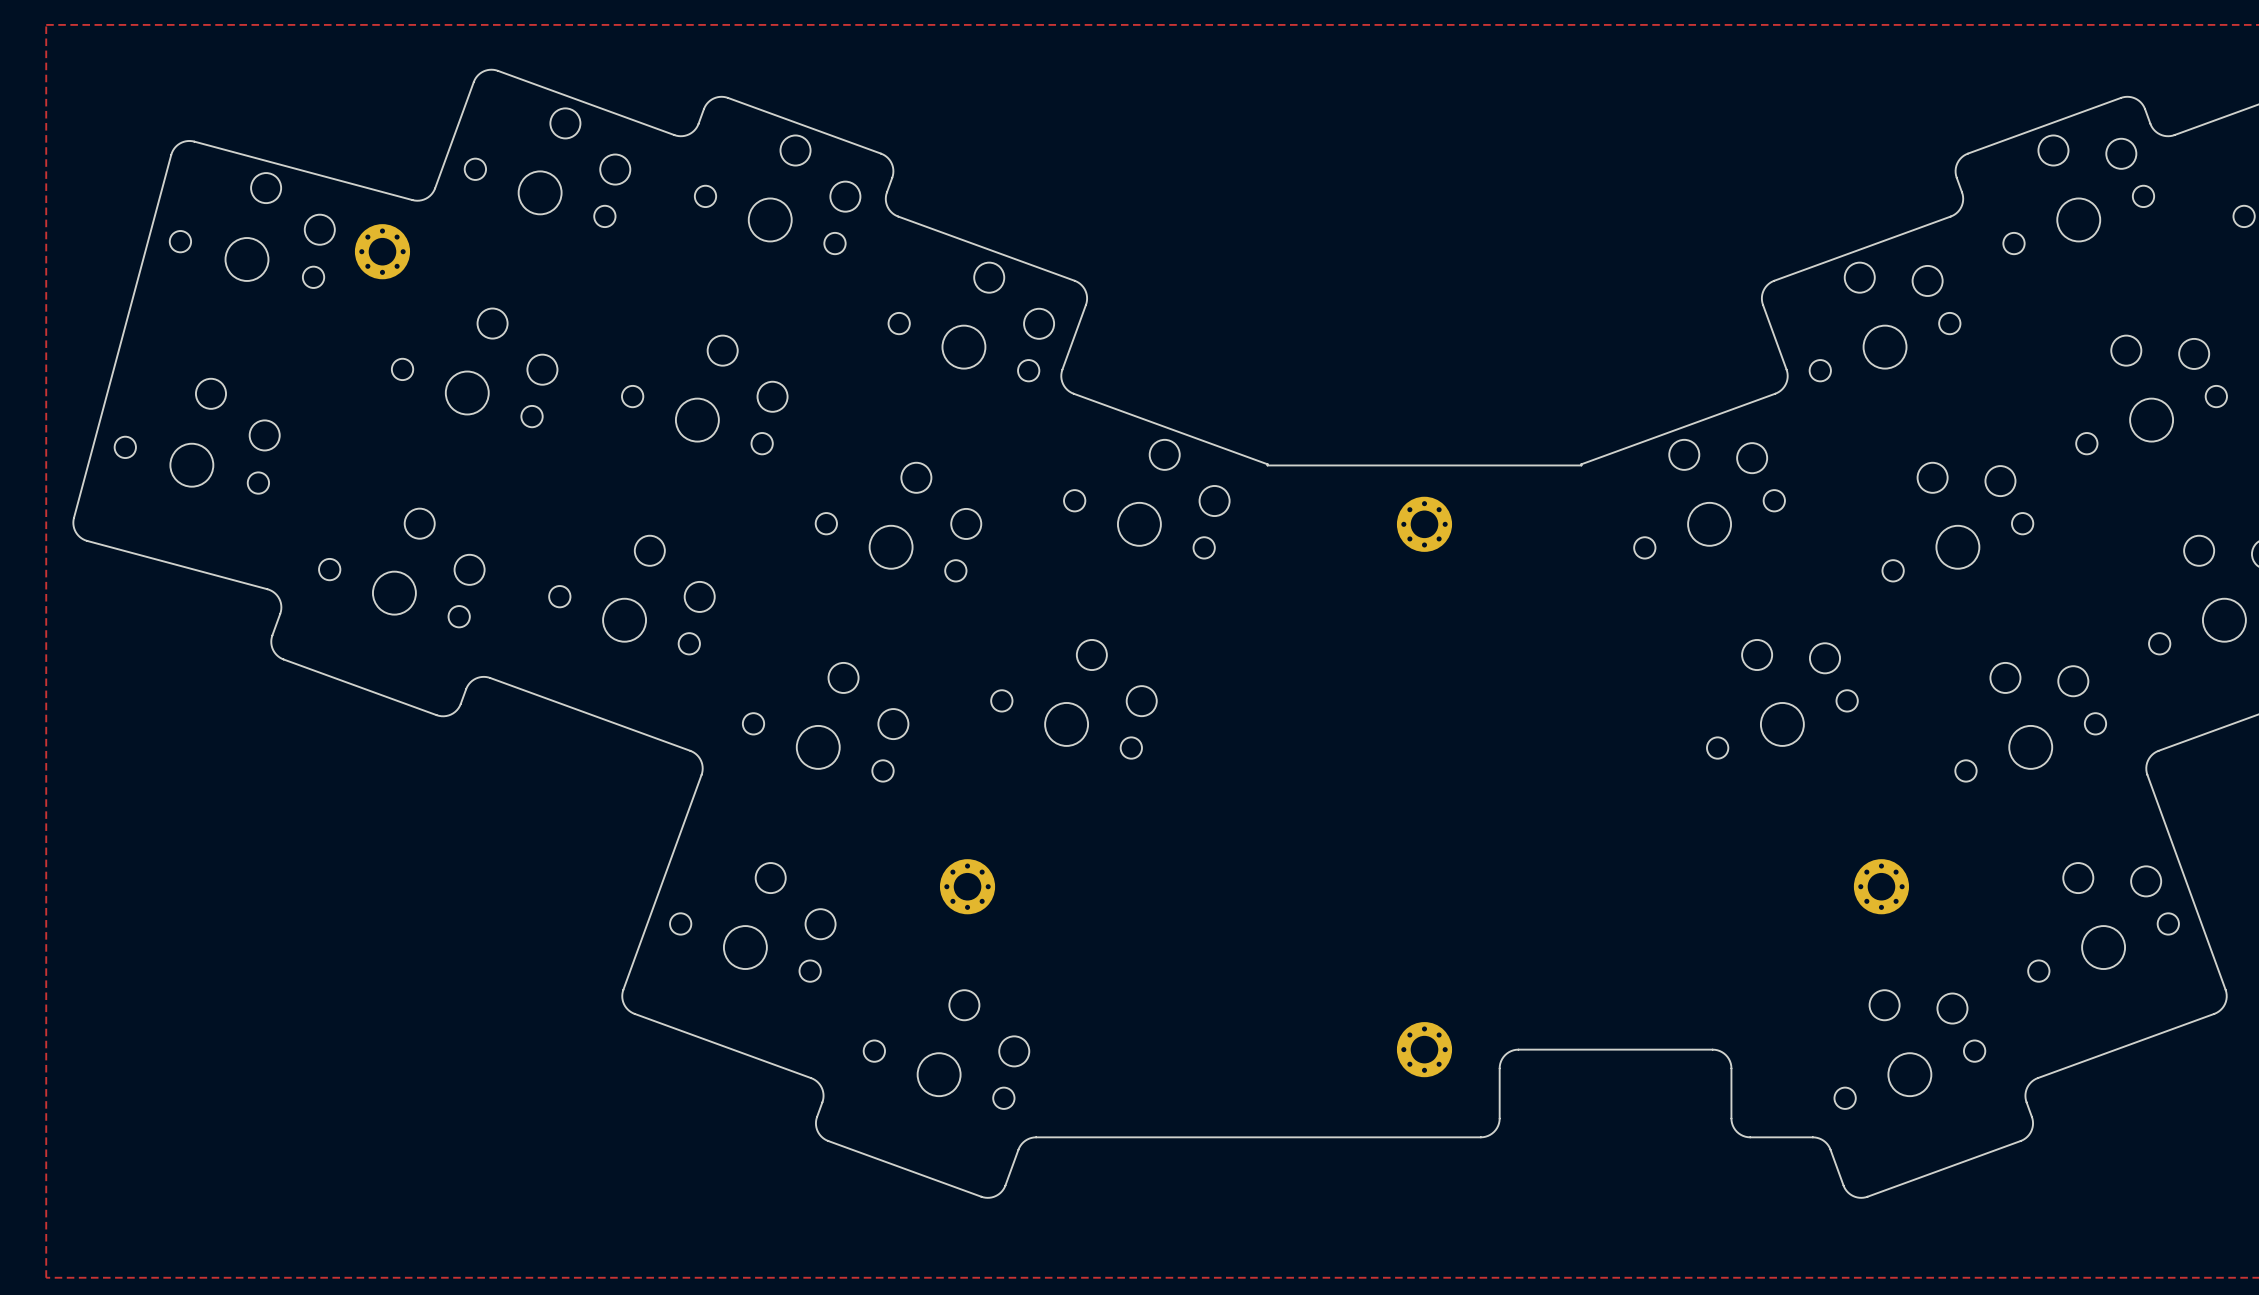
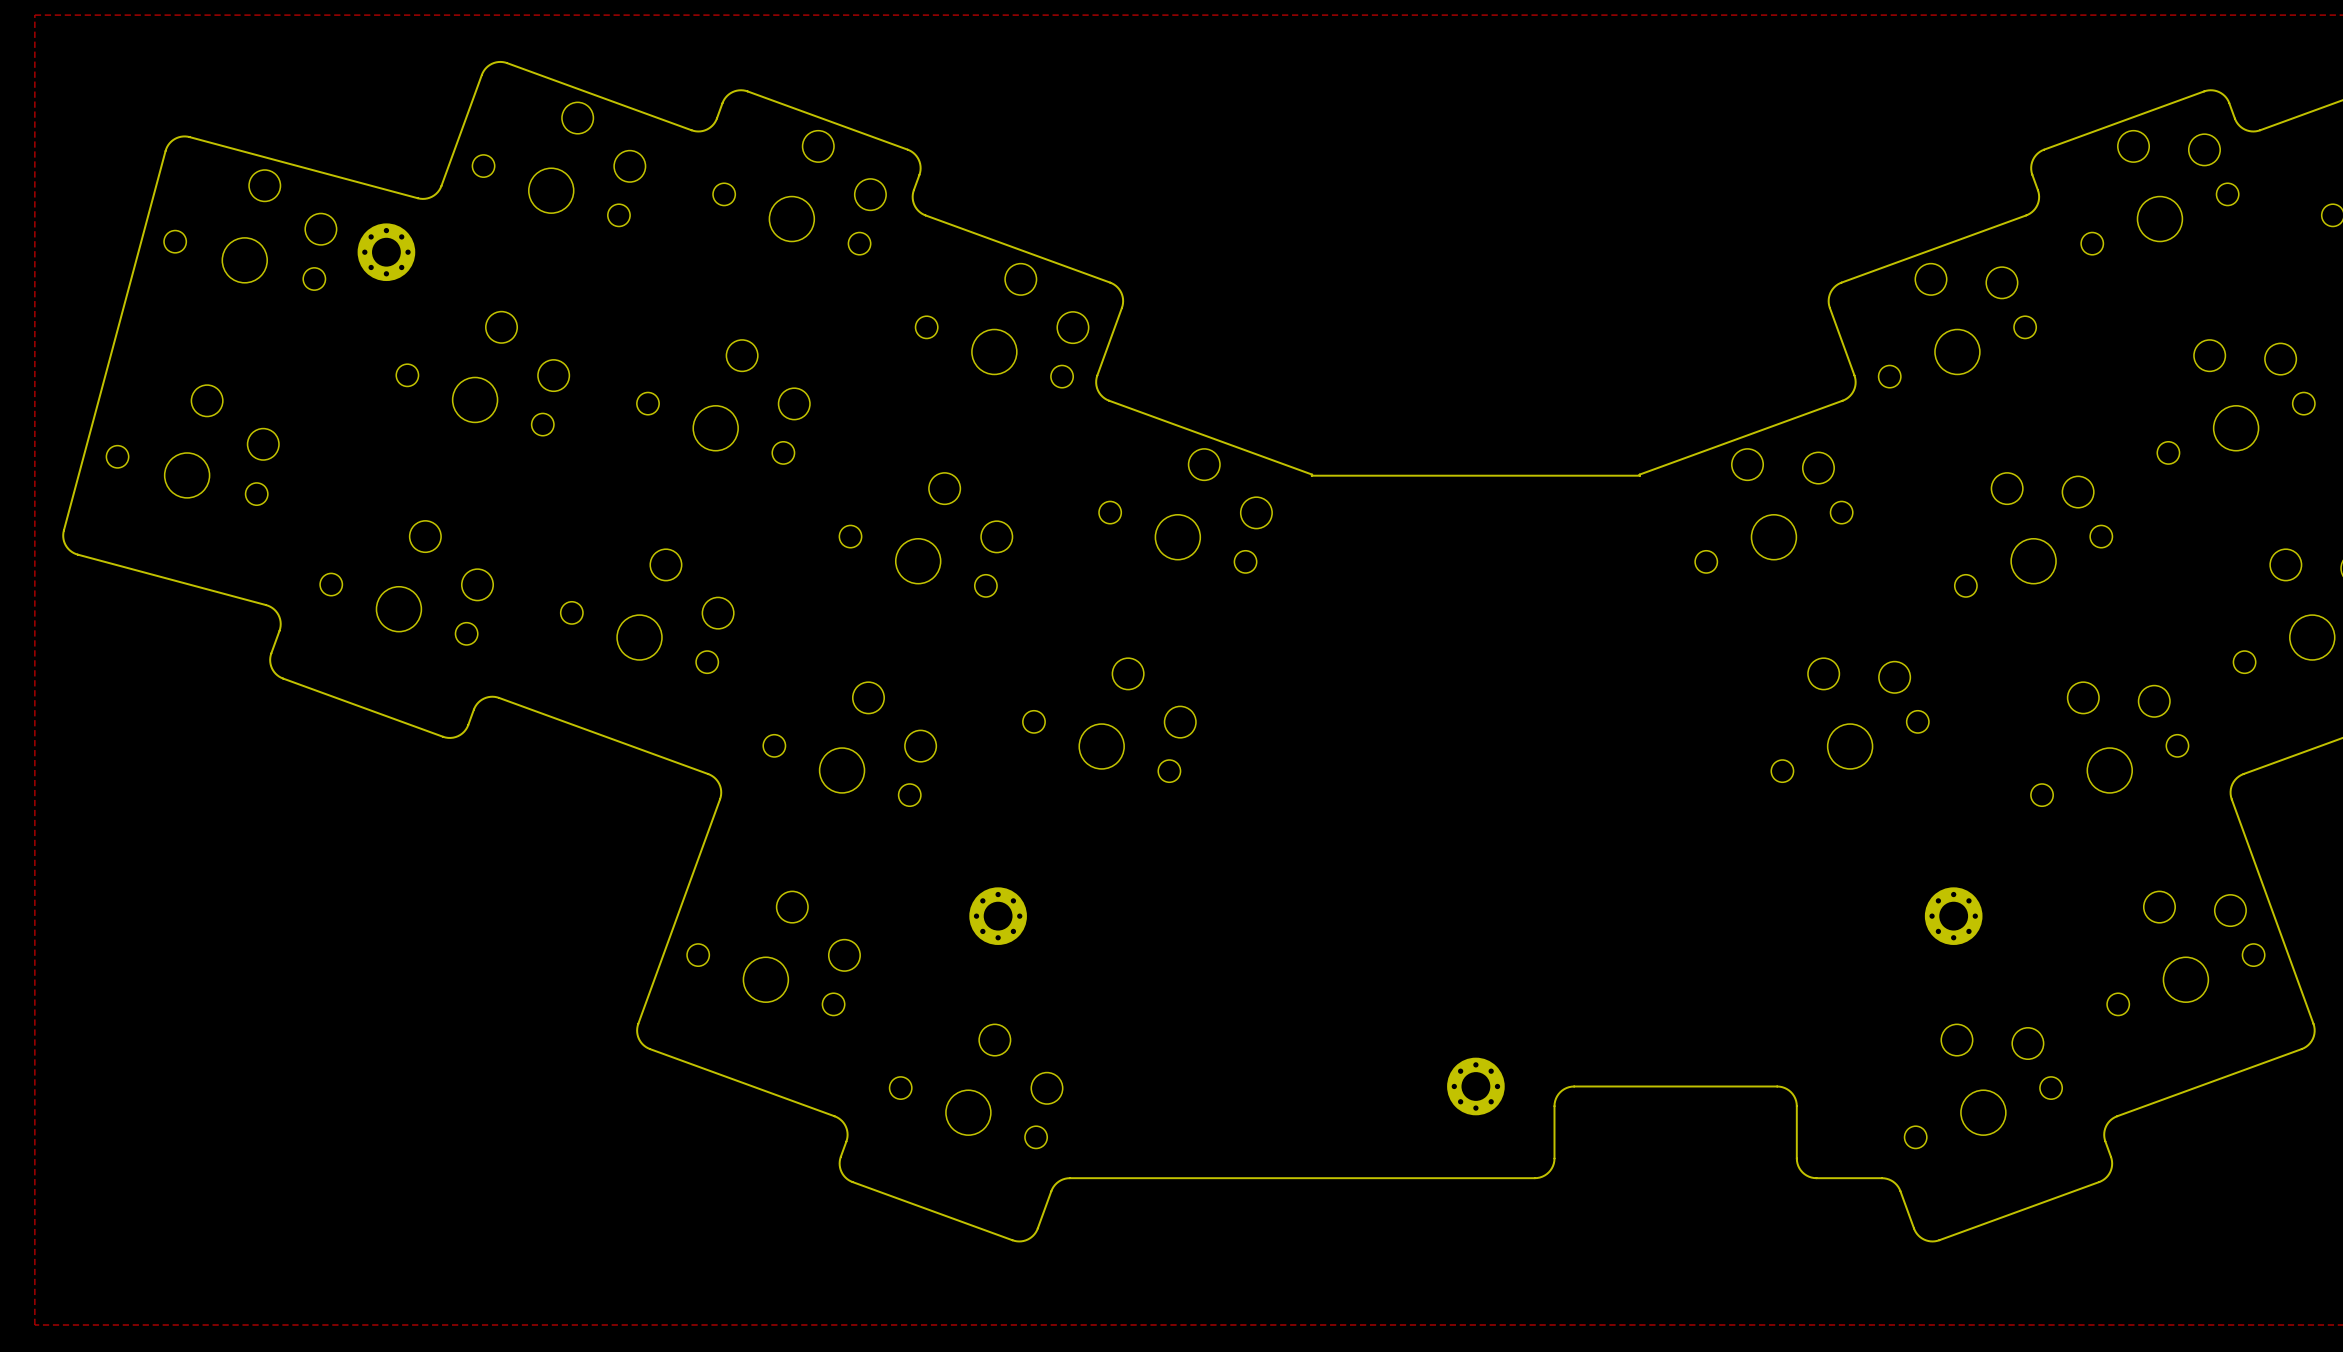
part: (1424, 524) -> none

